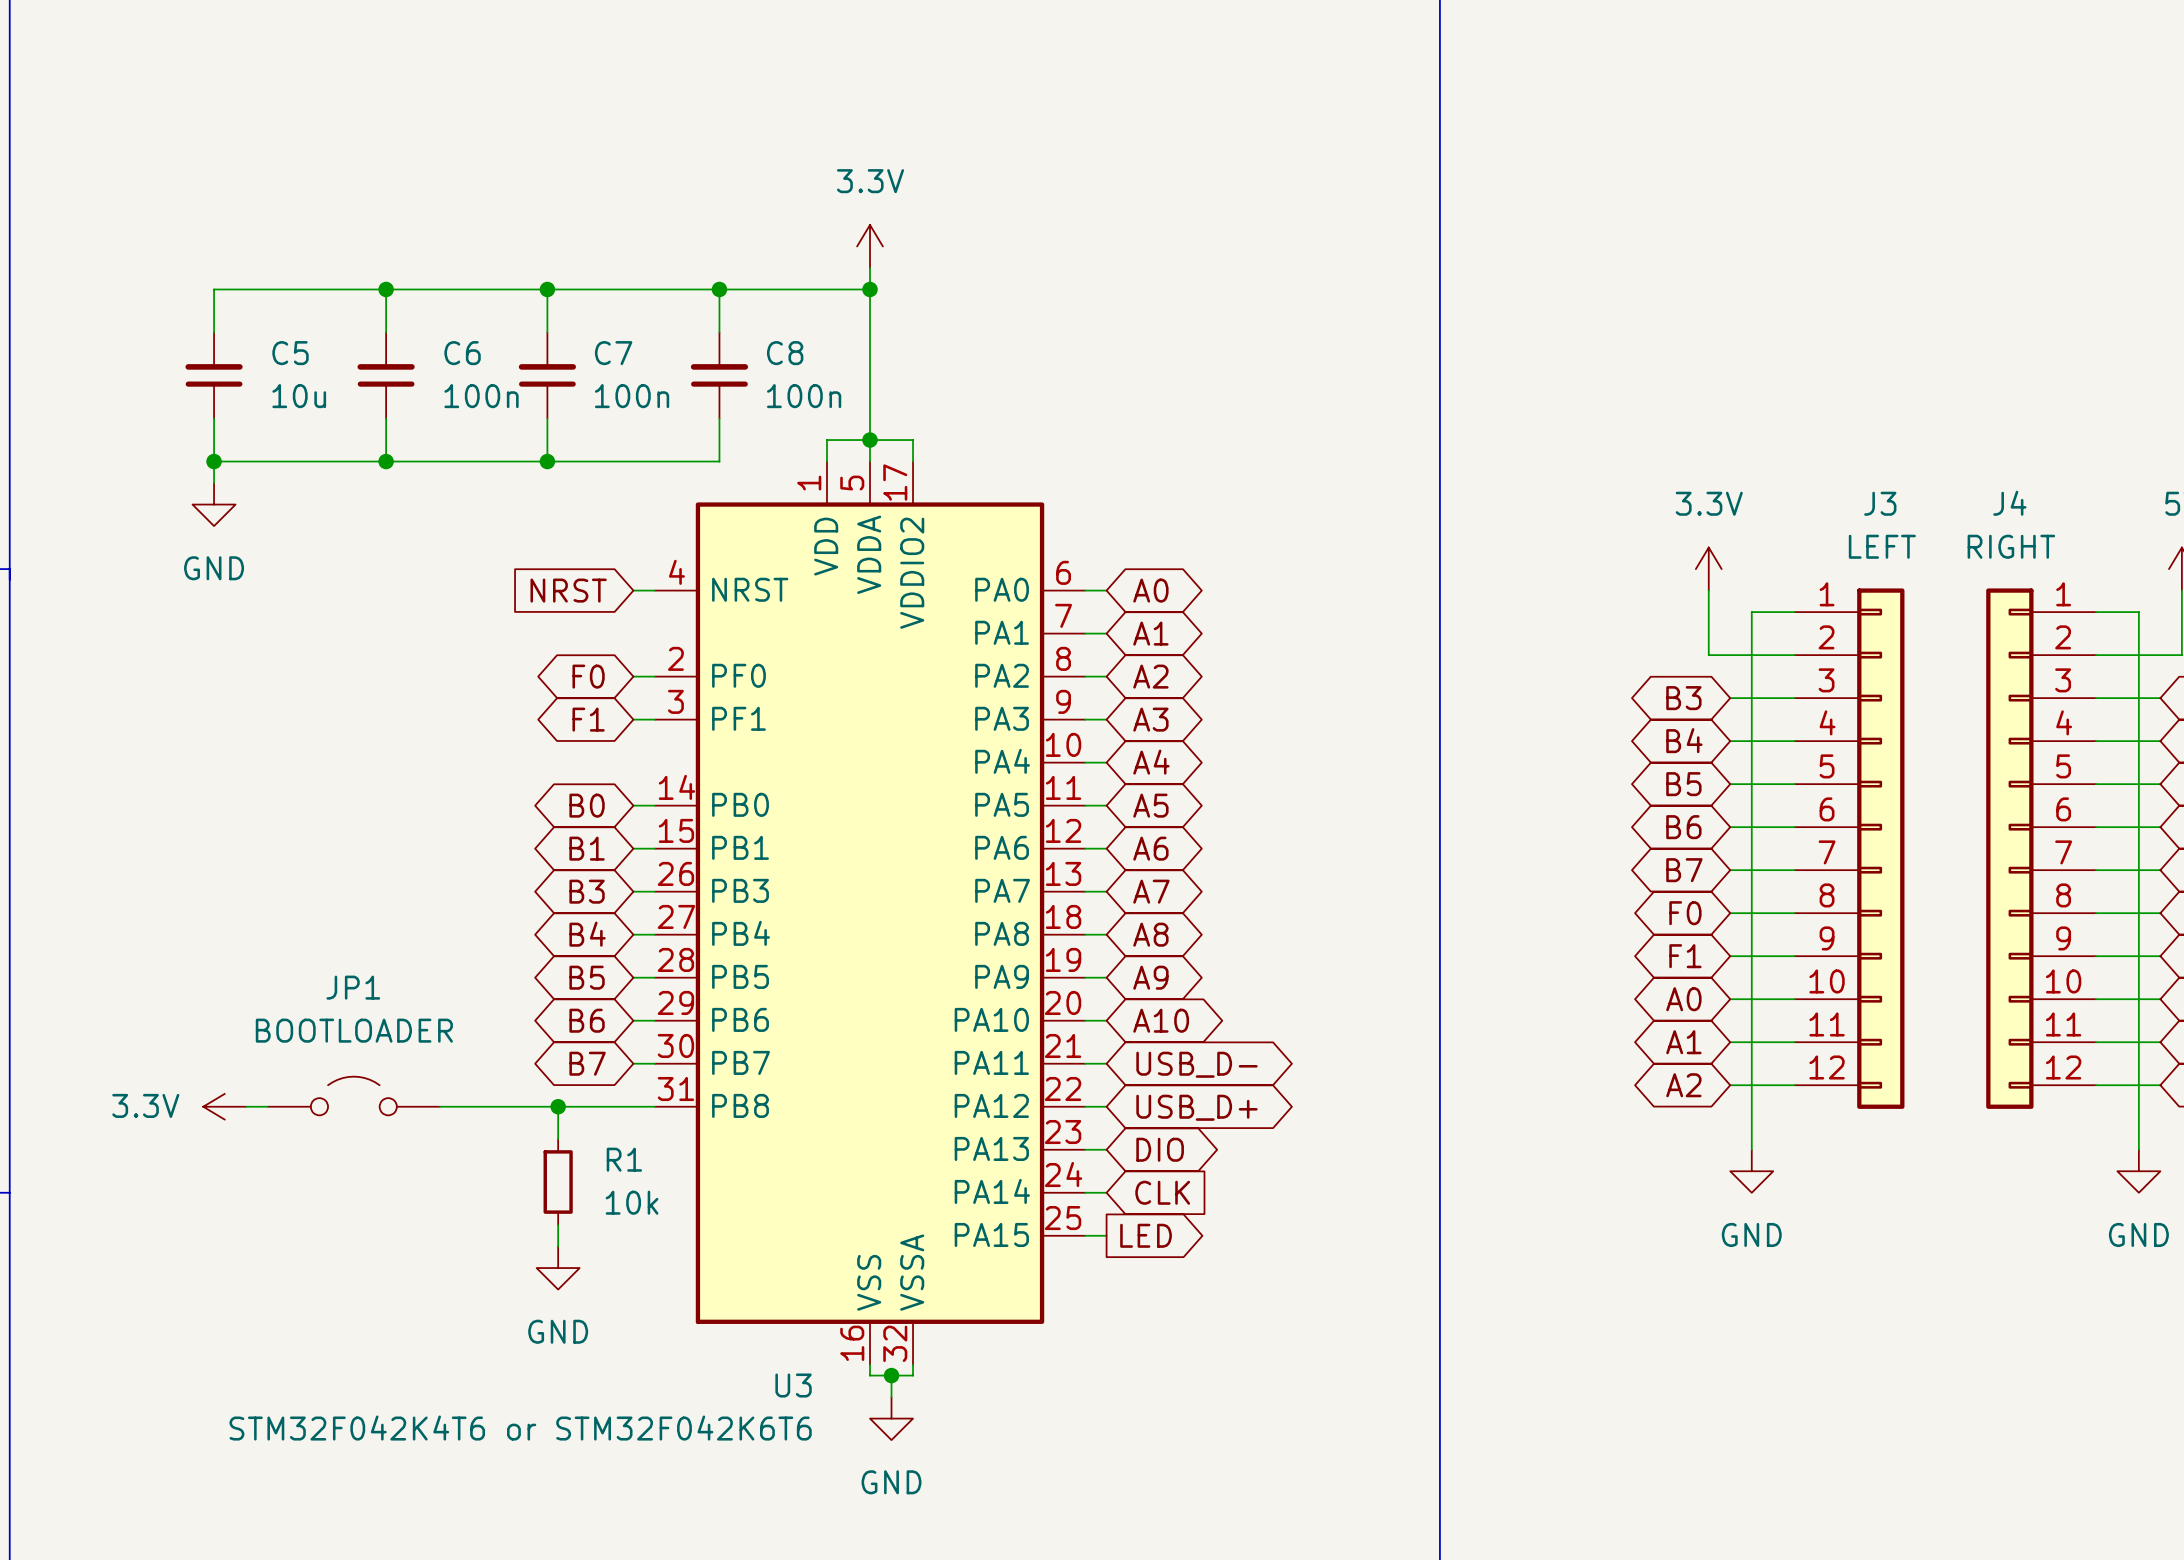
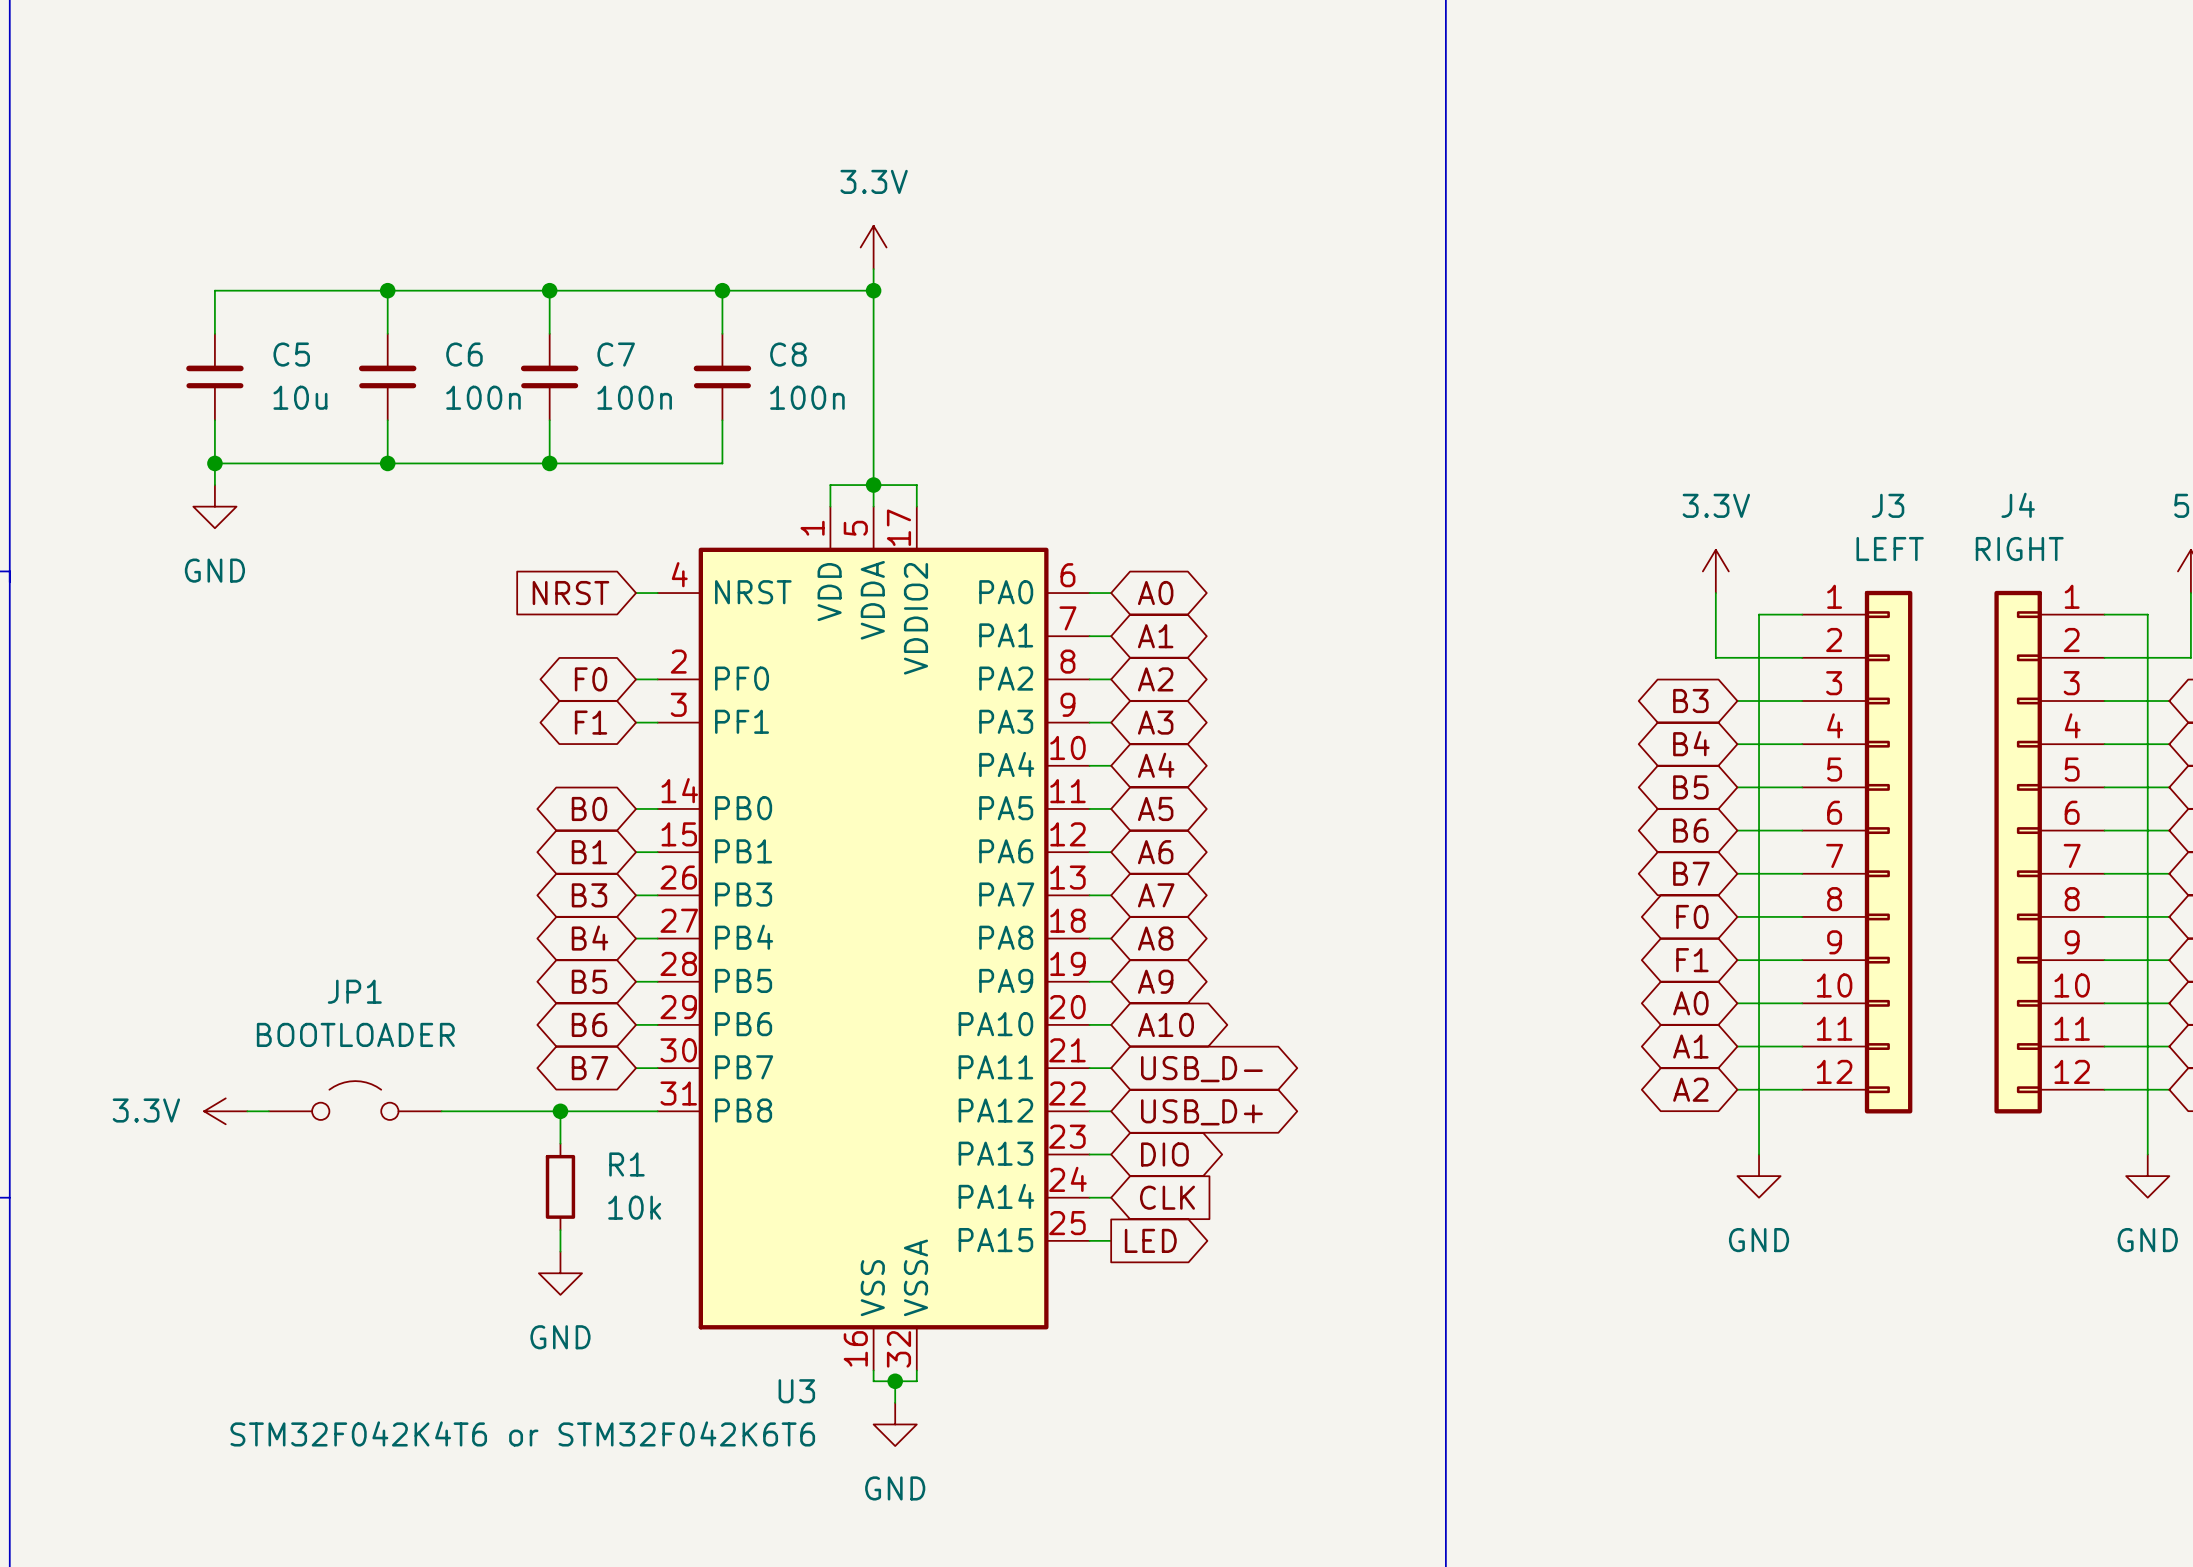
junction position: (870, 440) -> (873, 485)
U3 symbol: [654, 461, 1086, 1365] -> [657, 506, 1090, 1371]
wire: (826, 461) (826, 440) (913, 440) (913, 461) -> (830, 506) (830, 485) (916, 485) (916, 506)

